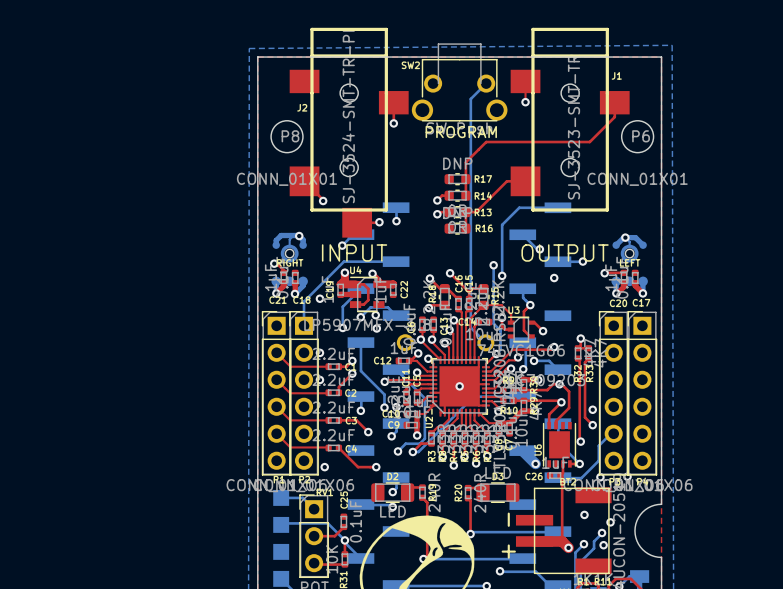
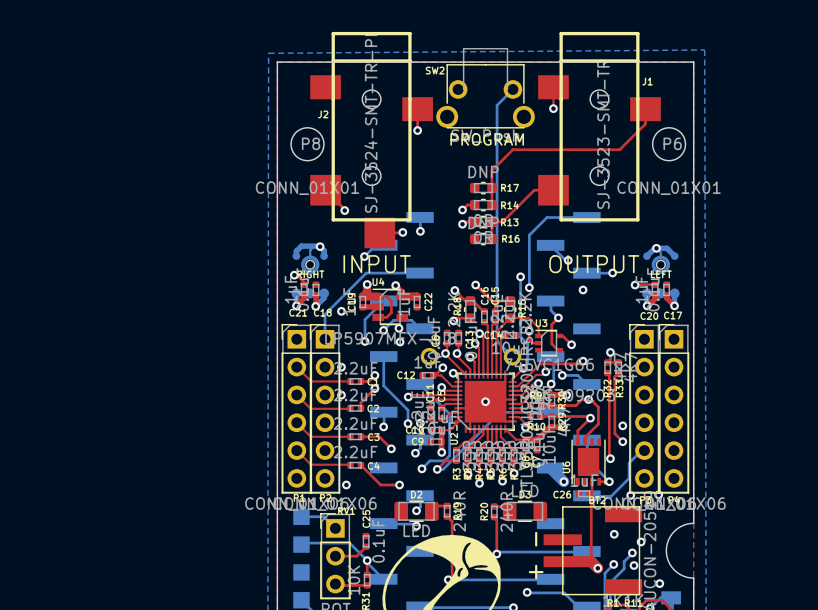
via: none -> (659, 583)

